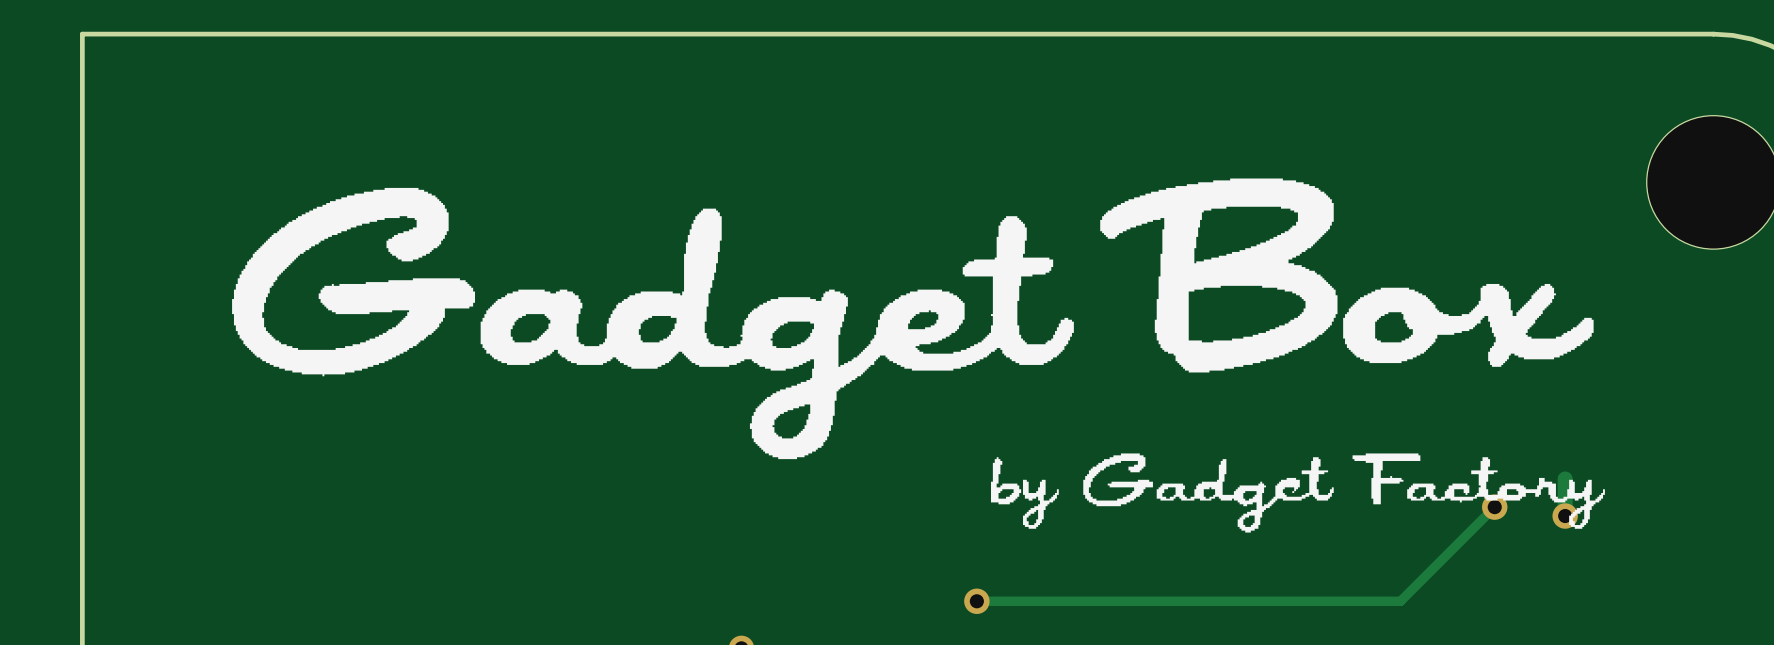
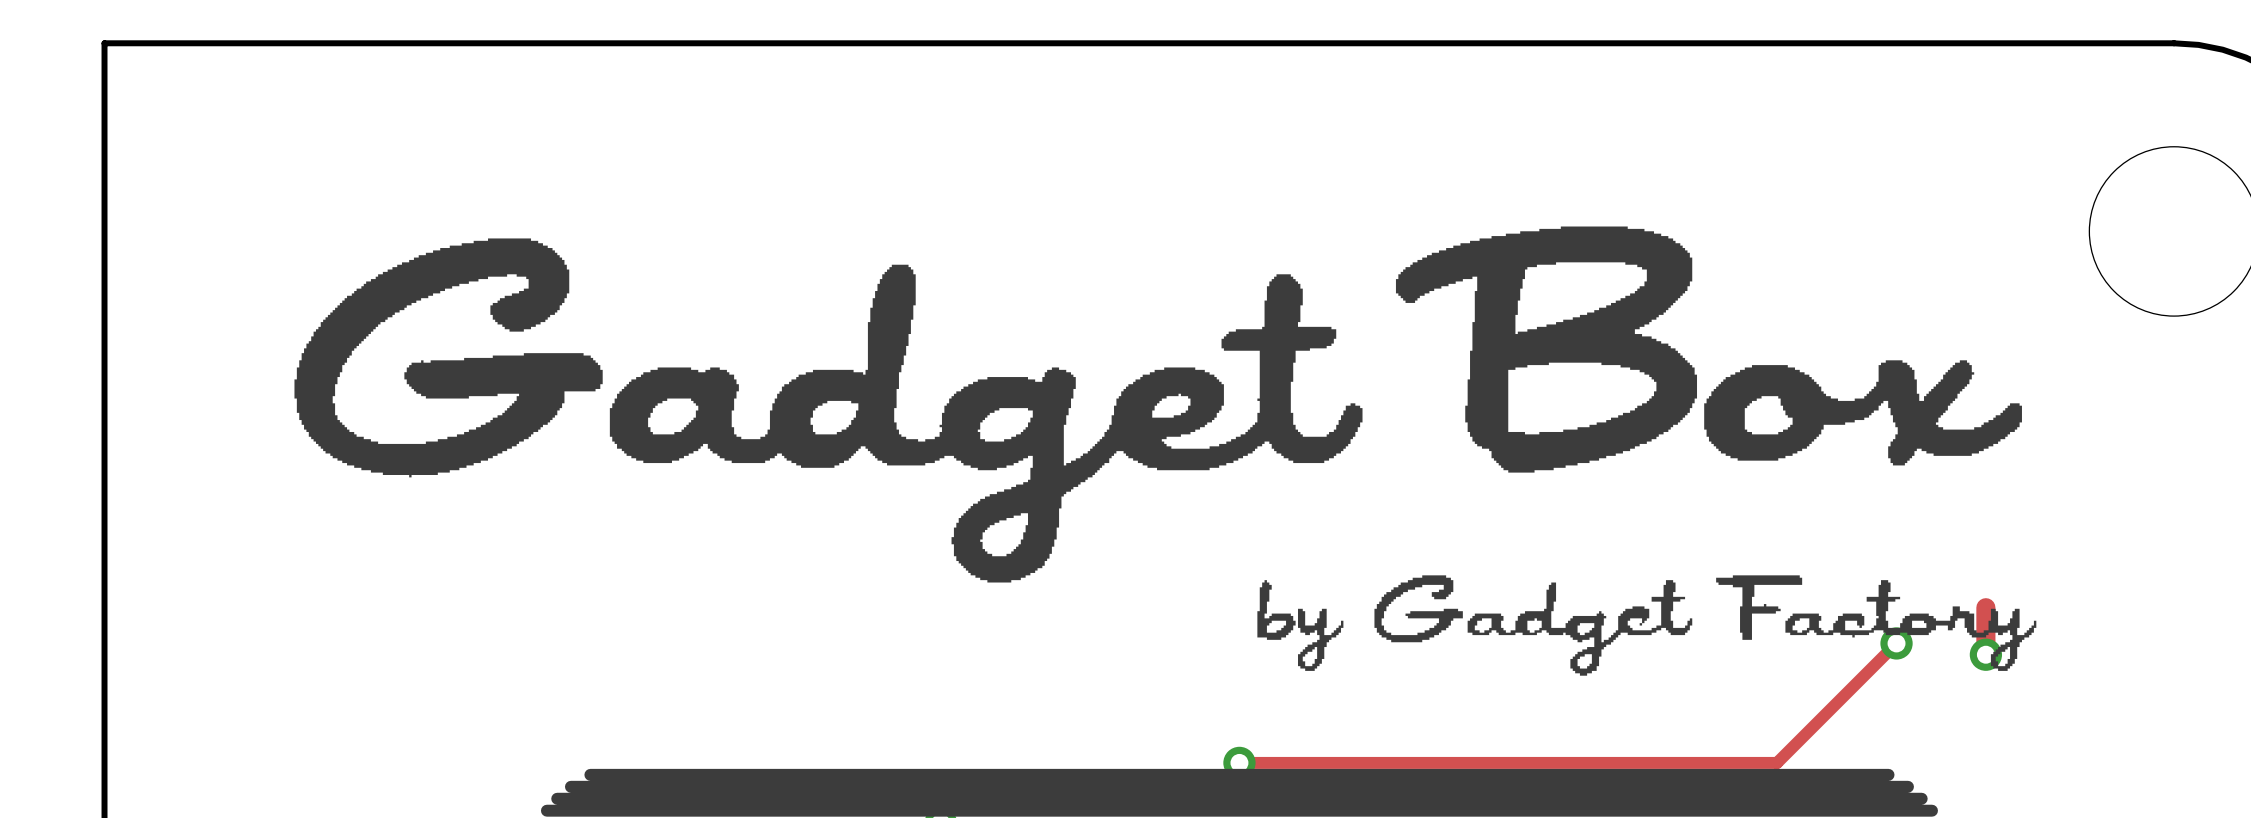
line: none -> (590, 774) (1888, 774)
line: none -> (570, 786) (1907, 786)
line: none -> (557, 798) (1921, 798)
line: none -> (546, 810) (1931, 810)

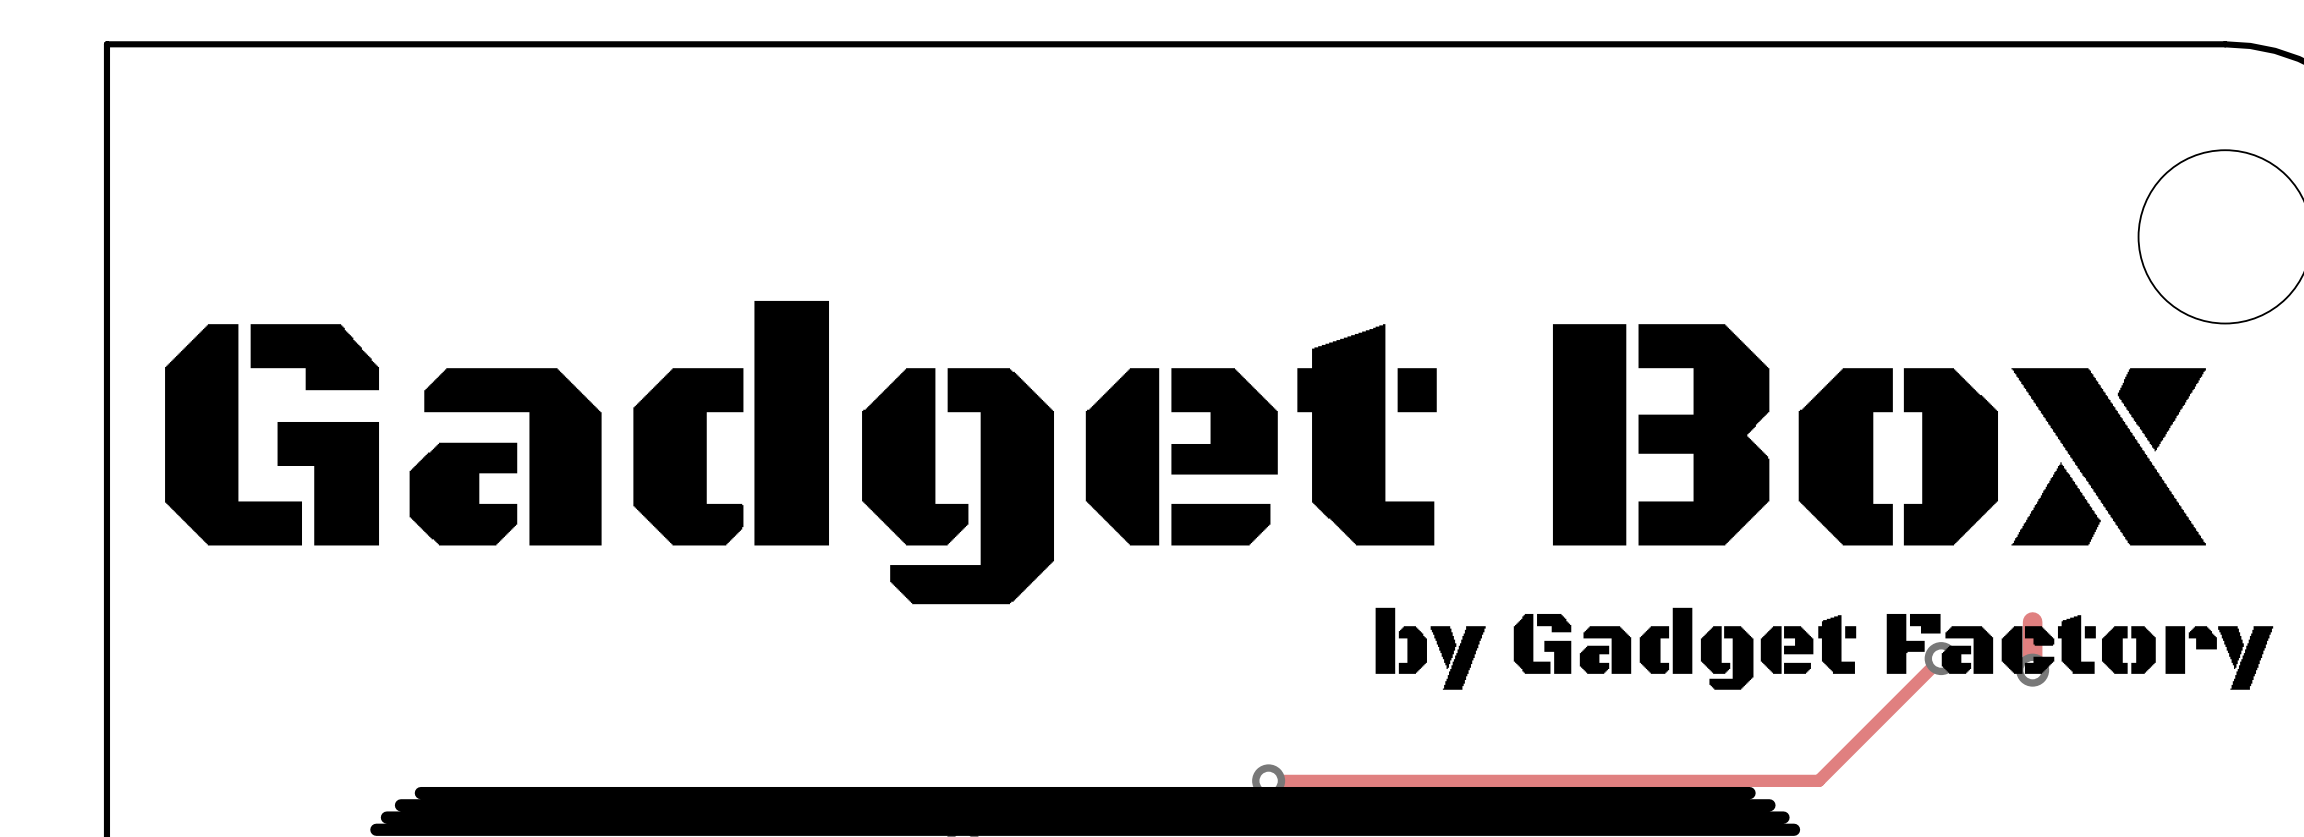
drawing shape: [294, 226, 2037, 676] -> [165, 300, 2274, 690]
line: none -> (420, 793) (604, 793)
line: (1709, 774) (1888, 774) -> none
line: none -> (400, 805) (584, 805)
line: (1728, 786) (1907, 786) -> none
line: none -> (386, 817) (570, 817)
line: (1742, 798) (1921, 798) -> none
line: none -> (376, 829) (559, 829)
line: (1752, 810) (1931, 810) -> none

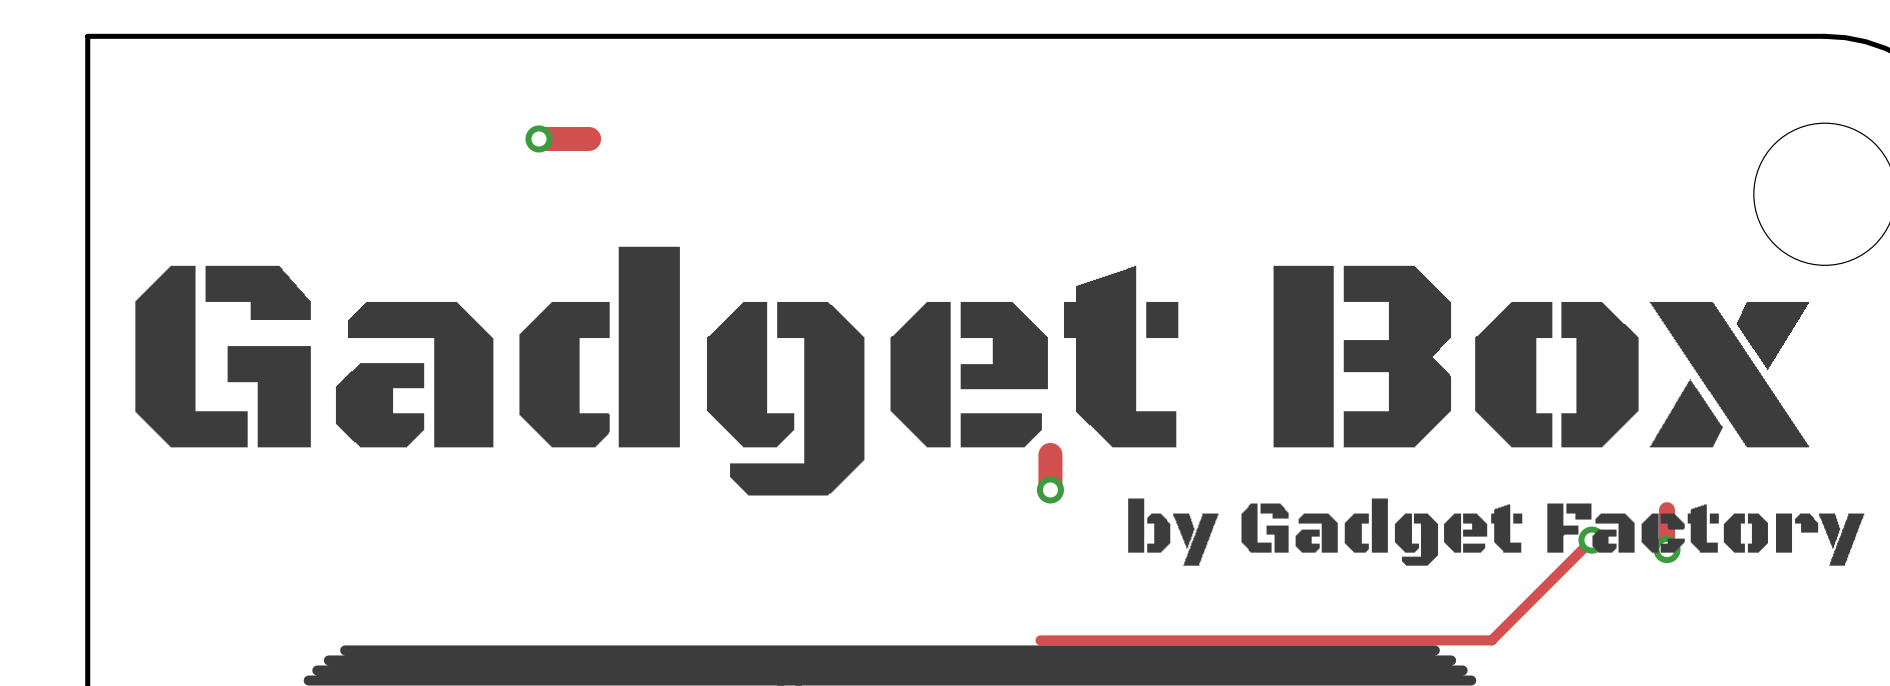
track: none -> (539, 138) (589, 138)
via: none -> (539, 138)
track: none -> (1050, 454) (1050, 489)
via: none -> (1050, 489)
via: (1268, 780) -> none

